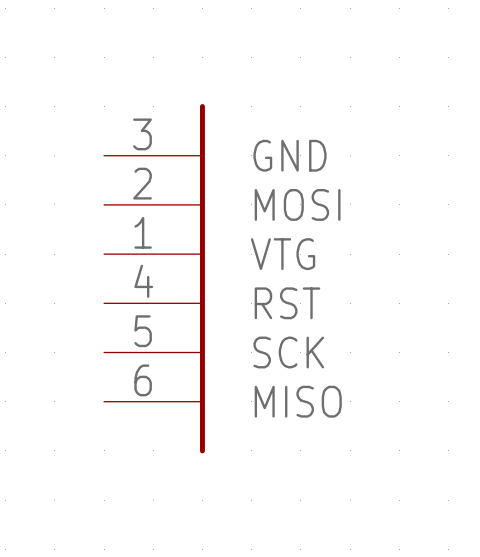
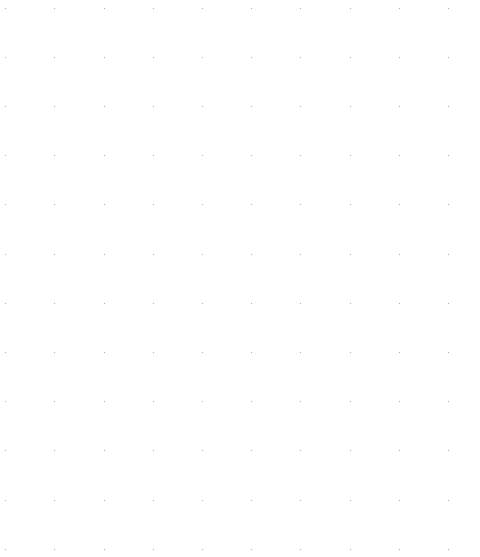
part: (154, 278) -> none

